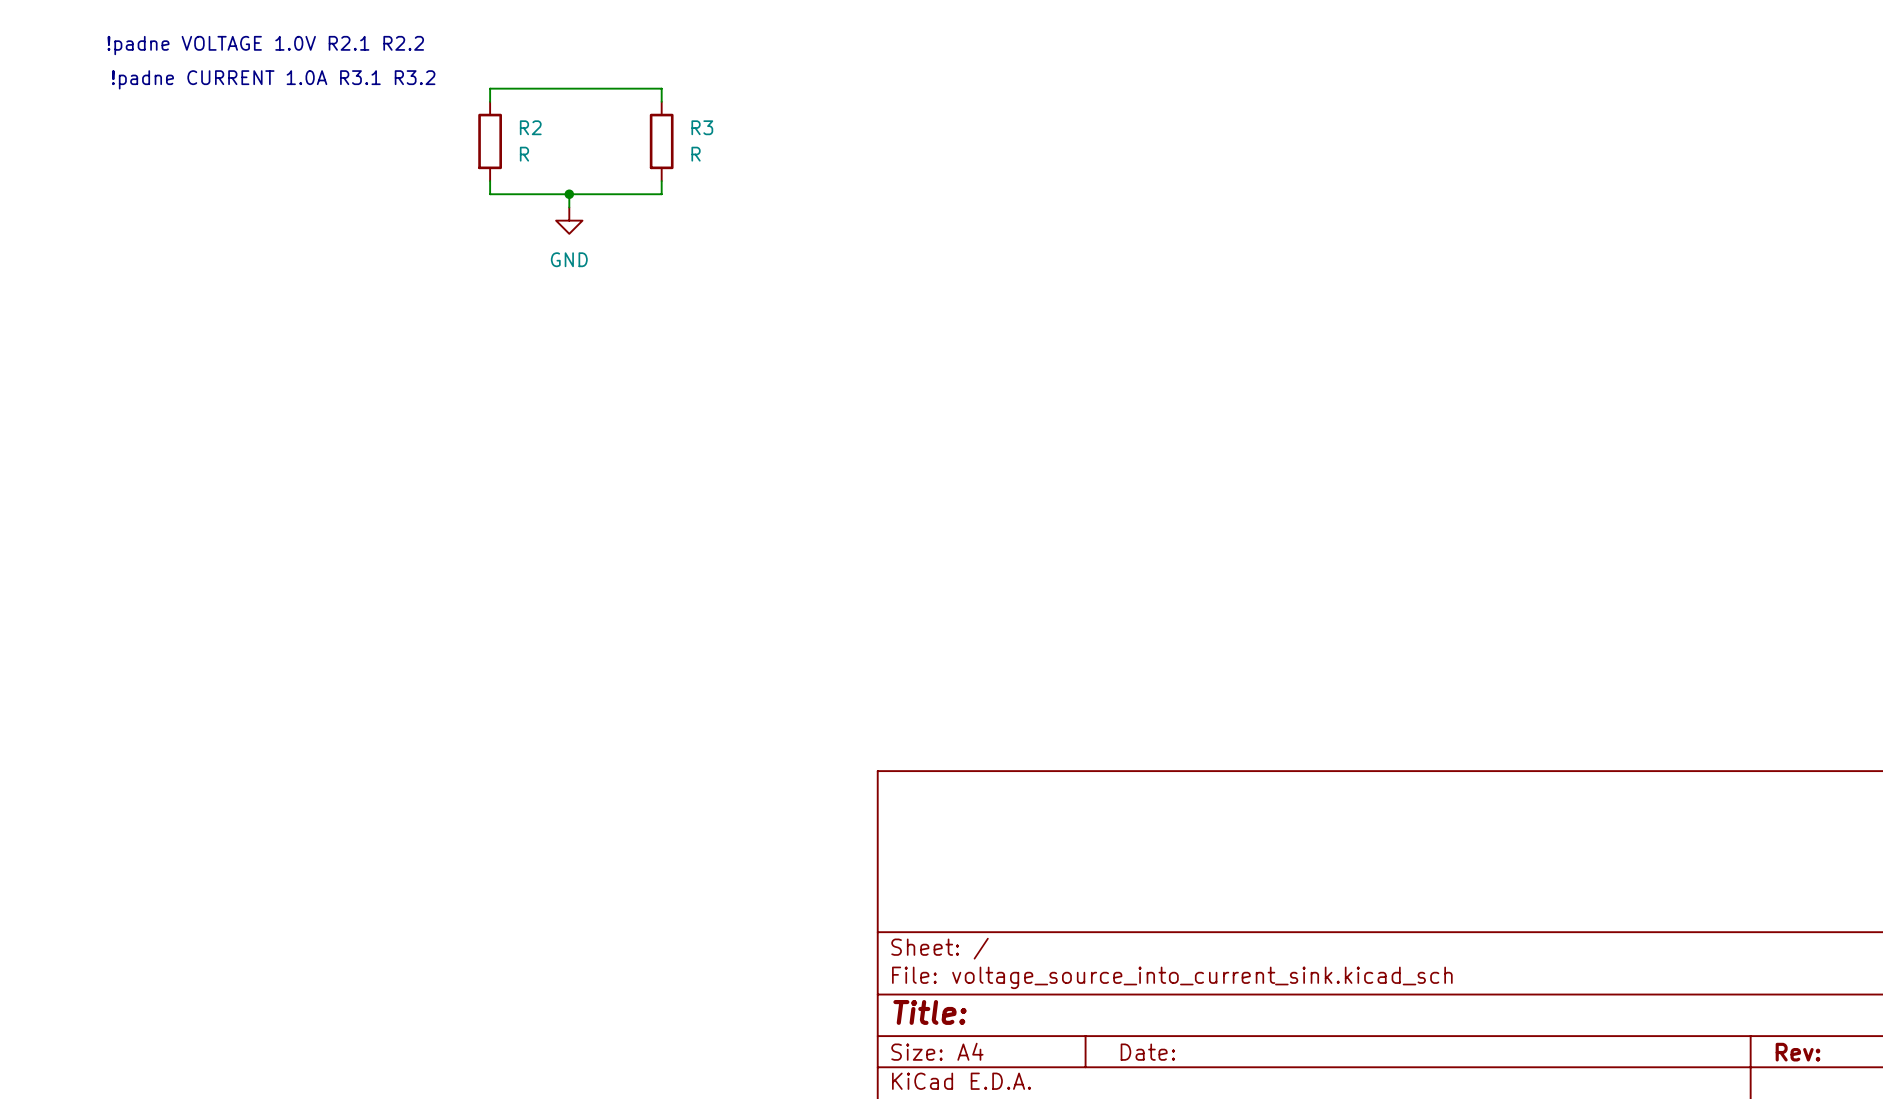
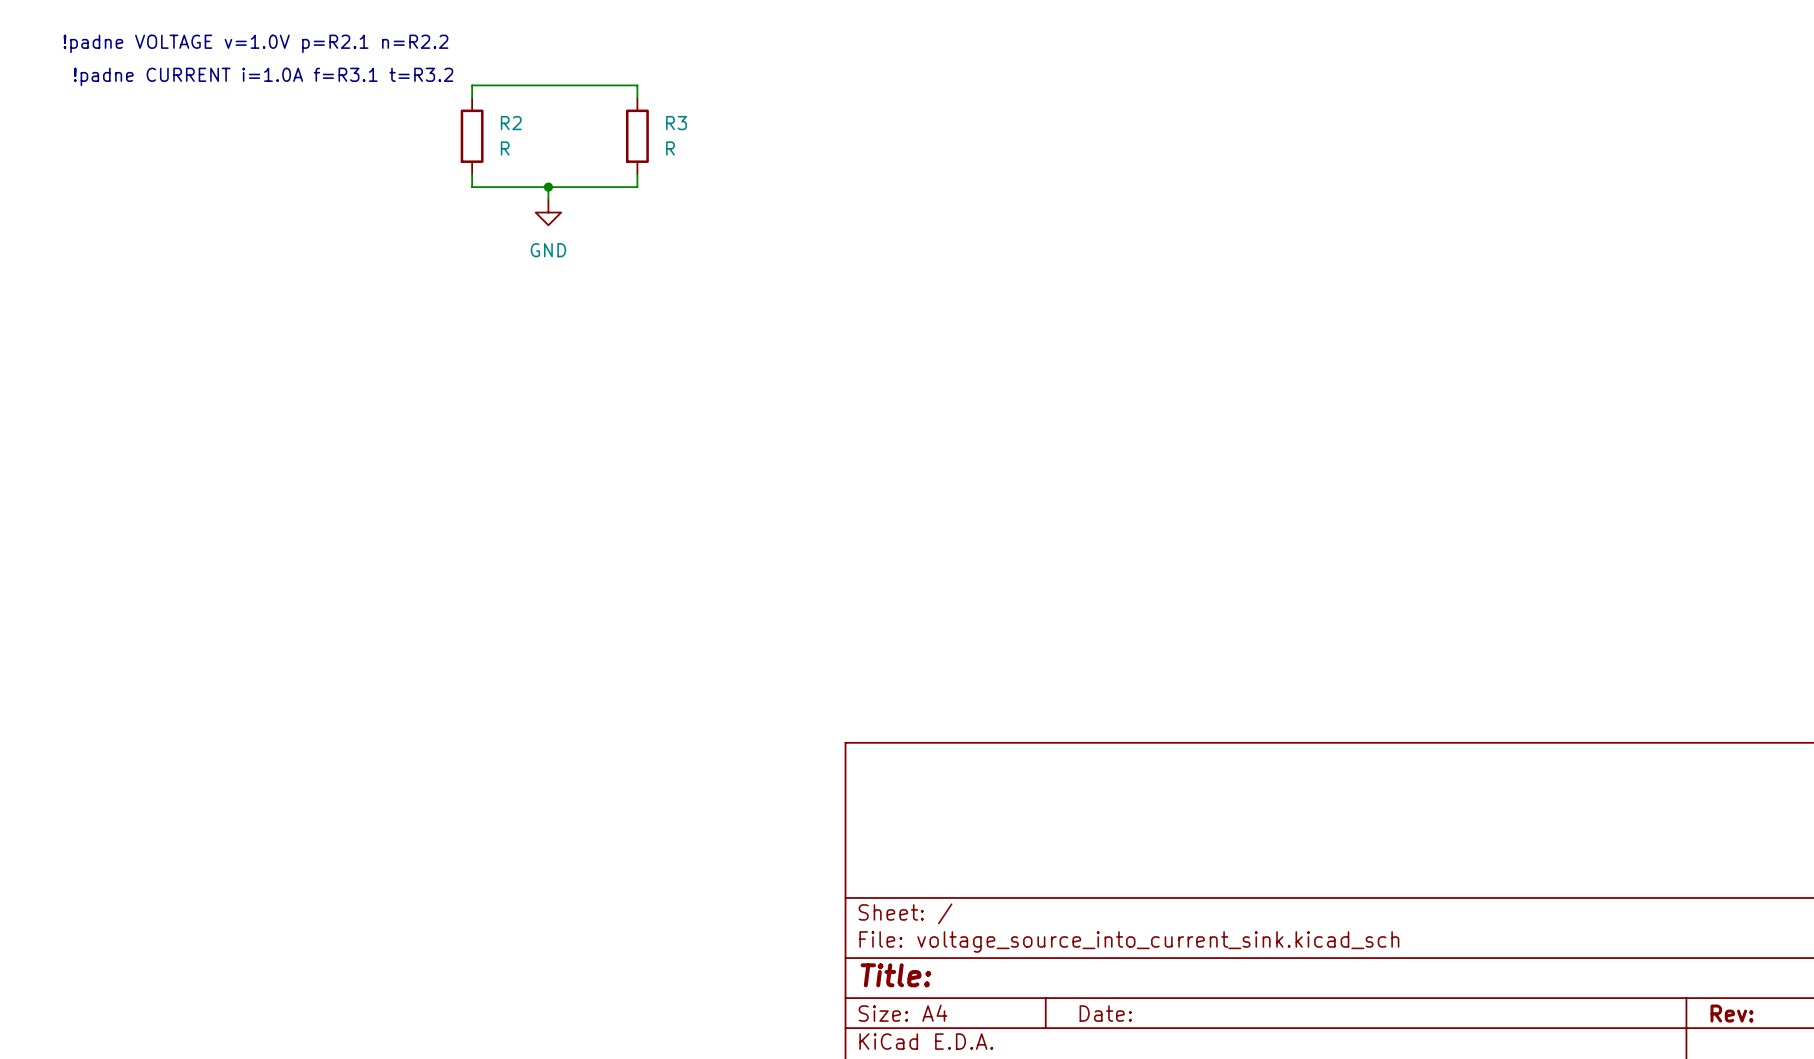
text: !padne VOLTAGE 1.0V R2.1 R2.2 (265, 45) -> !padne VOLTAGE v=1.0V p=R2.1 n=R2.2 (256, 43)
text: !padne CURRENT 1.0A R3.1 R3.2 (273, 79) -> !padne CURRENT i=1.0A f=R3.1 t=R3.2 (263, 76)

